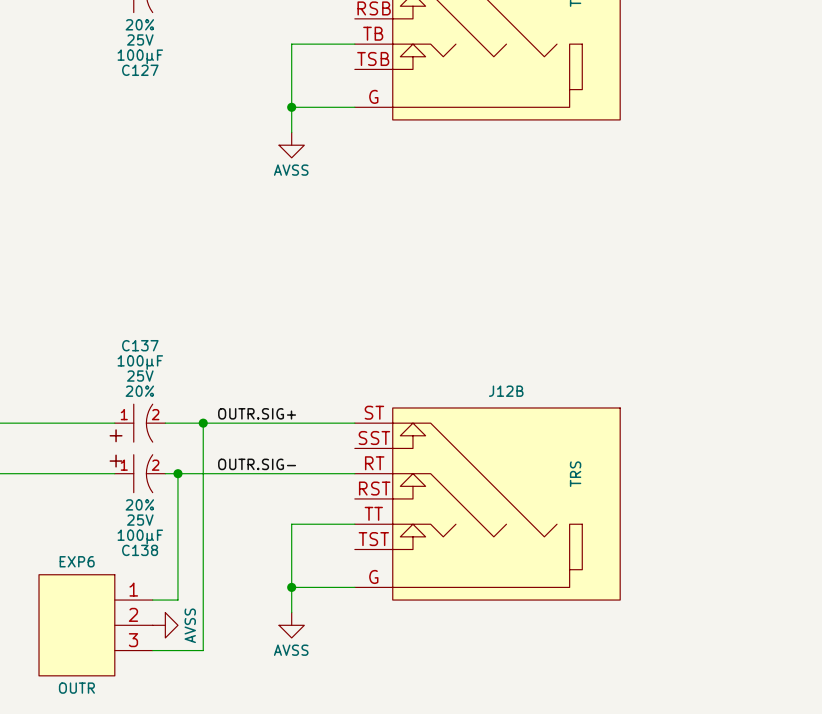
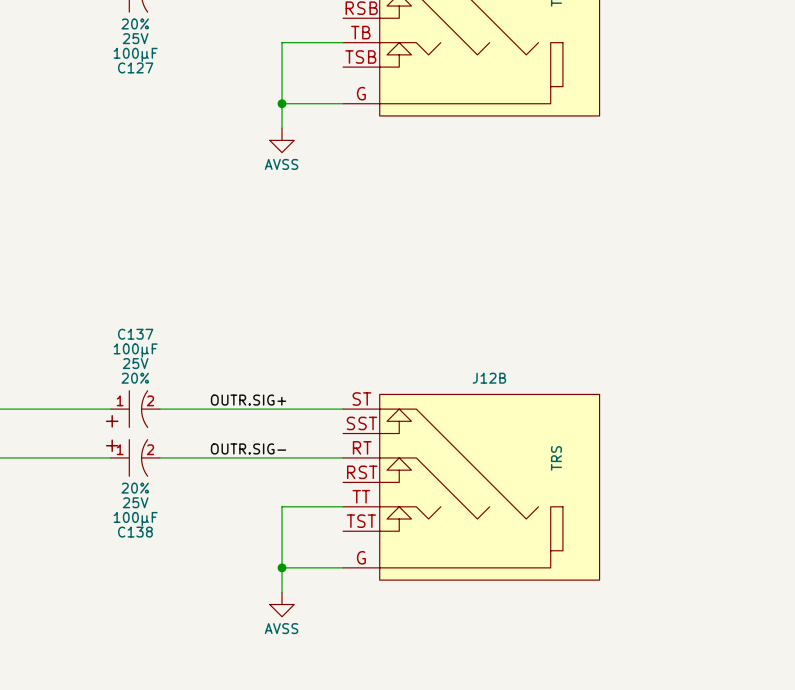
wire: (203, 423) (203, 650) (152, 650) -> none
junction: (203, 423) -> none
wire: (177, 473) (177, 600) (152, 600) -> none
junction: (177, 473) -> none
EXP6: OUTR (95, 625) -> none
power symbol: AVSS (165, 625) -> none

